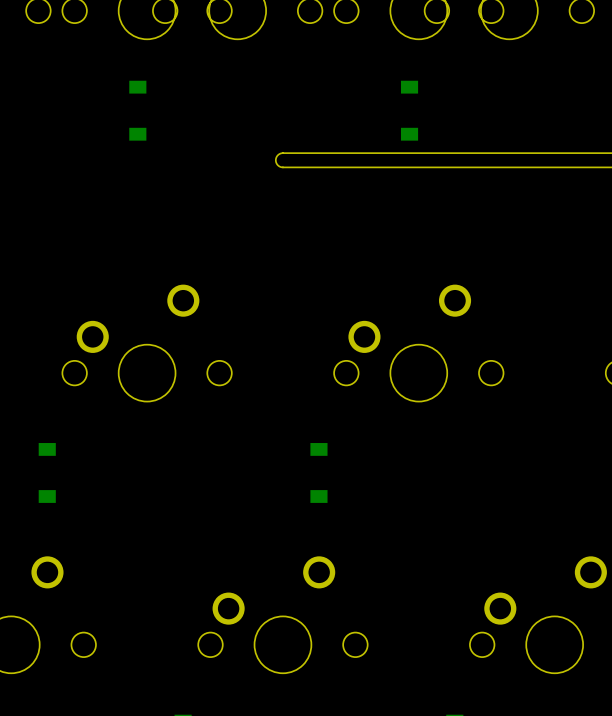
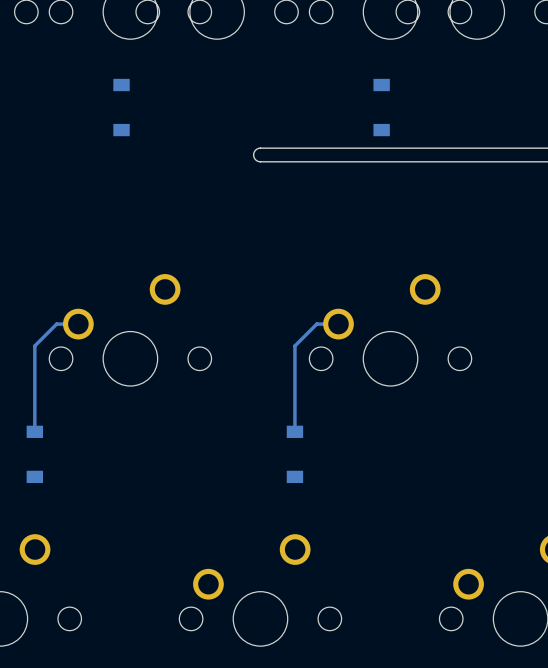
bottom track: none -> (78, 324) (56, 324) (34, 345) (34, 431)
bottom track: none -> (338, 324) (316, 324) (294, 345) (294, 431)

